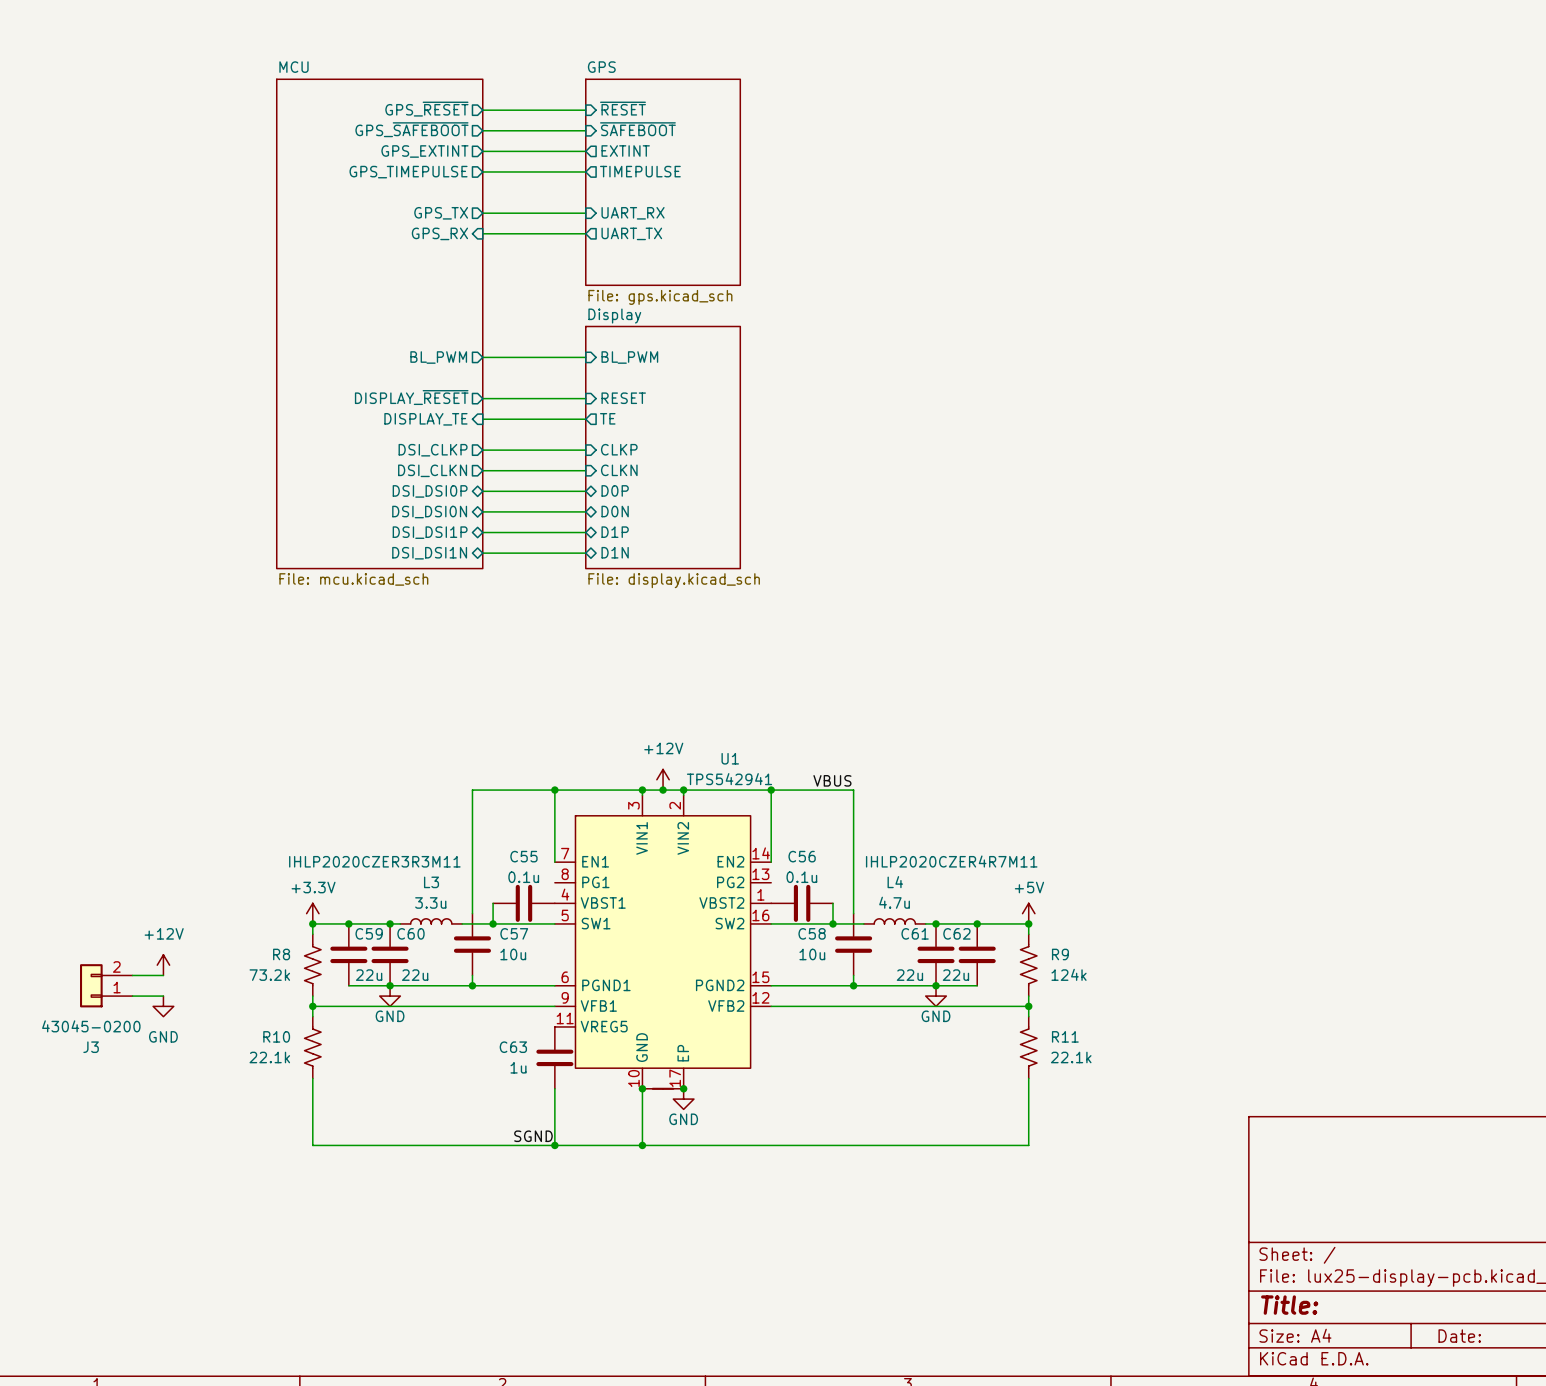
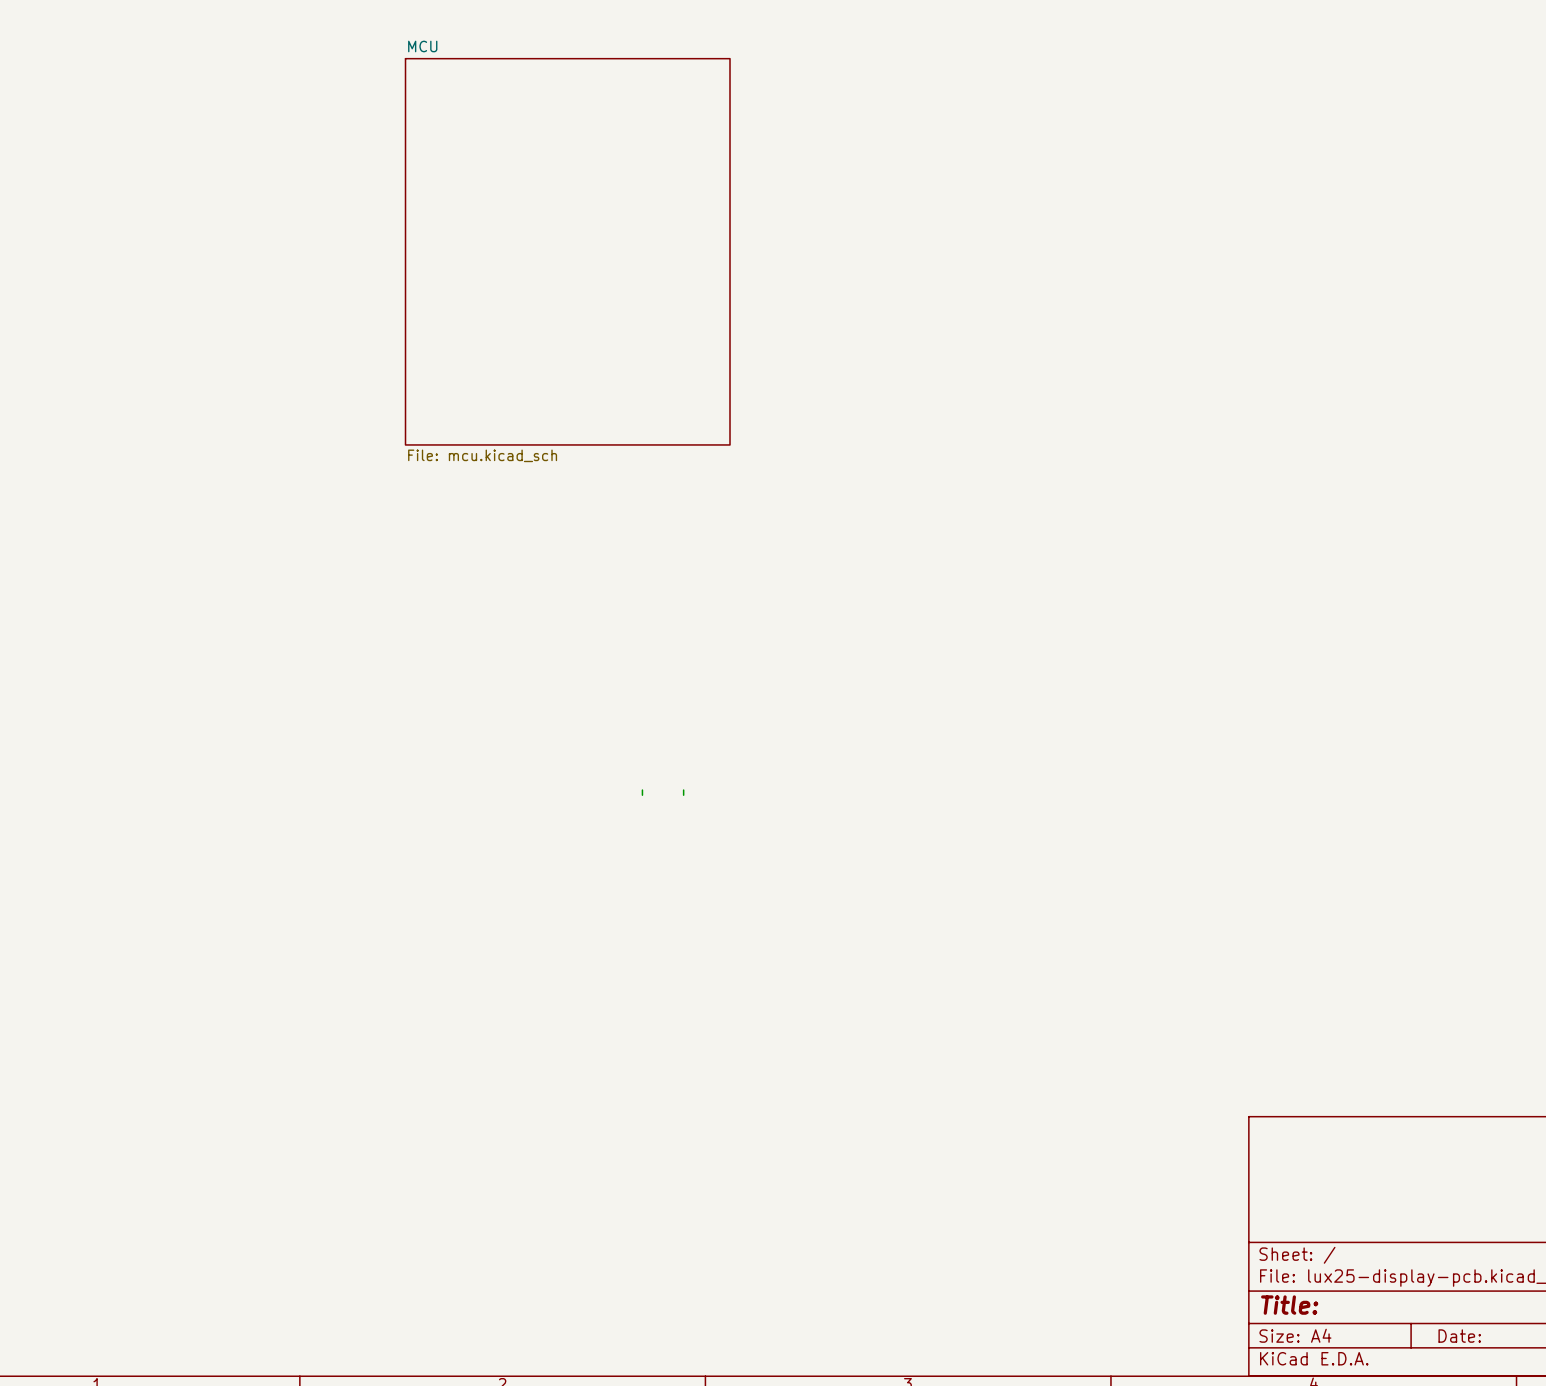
sheet pin: ~{RESET} (623, 108) -> none
sheet pin: GPS_~{RESET} (426, 109) -> none
wire: (482, 110) (585, 110) -> none
sheet pin: GPS_~{SAFEBOOT} (411, 129) -> none
sheet pin: ~{SAFEBOOT} (637, 129) -> none
wire: (482, 130) (585, 130) -> none
sheet pin: GPS_EXTINT (424, 151) -> none
wire: (482, 151) (585, 151) -> none
sheet pin: EXTINT (625, 151) -> none
wire: (482, 171) (585, 171) -> none
sheet pin: TIMEPULSE (640, 171) -> none
sheet pin: GPS_TIMEPULSE (408, 172) -> none
sheet GPS: File: gps.kicad_sch (663, 182) -> none
sheet pin: GPS_TX (441, 213) -> none
wire: (482, 213) (585, 213) -> none
sheet pin: UART_RX (633, 213) -> none
sheet pin: GPS_RX (439, 233) -> none
wire: (482, 233) (585, 233) -> none
sheet pin: UART_TX (631, 233) -> none
sheet MCU: none -> File: mcu.kicad_sch (567, 251)
sheet MCU: File: mcu.kicad_sch (379, 323) -> none
sheet pin: BL_PWM (438, 357) -> none
wire: (482, 357) (585, 357) -> none
sheet pin: BL_PWM (629, 357) -> none
sheet pin: DISPLAY_~{RESET} (411, 397) -> none
wire: (482, 398) (585, 398) -> none
sheet pin: RESET (623, 398) -> none
sheet pin: TE (607, 418) -> none
sheet pin: DISPLAY_TE (425, 419) -> none
wire: (482, 419) (585, 419) -> none
sheet Display: File: display.kicad_sch (663, 447) -> none
sheet pin: CLKP (619, 449) -> none
sheet pin: DSI_CLKP (433, 450) -> none
wire: (482, 450) (585, 450) -> none
sheet pin: DSI_CLKN (432, 470) -> none
wire: (482, 470) (585, 470) -> none
sheet pin: CLKN (619, 470) -> none
sheet pin: D0P (615, 490) -> none
sheet pin: DSI_DSI0P (430, 491) -> none
wire: (482, 491) (585, 491) -> none
wire: (482, 511) (585, 511) -> none
sheet pin: D0N (615, 511) -> none
sheet pin: DSI_DSI0N (429, 512) -> none
sheet pin: DSI_DSI1P (430, 532) -> none
wire: (482, 532) (585, 532) -> none
sheet pin: D1P (615, 532) -> none
sheet pin: D1N (615, 552) -> none
sheet pin: DSI_DSI1N (429, 553) -> none
wire: (482, 553) (585, 553) -> none
power symbol: +12V (663, 779) -> none
label: VBUS (832, 780) -> none
wire: (554, 790) (554, 862) -> none
junction: (554, 790) -> none
junction: (642, 790) -> none
junction: (663, 790) -> none
junction: (683, 790) -> none
wire: (771, 790) (771, 862) -> none
junction: (771, 790) -> none
wire: (493, 903) (493, 923) -> none
C55: 0.1u (523, 903) -> none
C56: 0.1u (802, 903) -> none
wire: (833, 903) (833, 923) -> none
power symbol: +3.3V (312, 913) -> none
wire: (472, 913) (472, 790) (853, 790) (853, 913) -> none
power symbol: +5V (1028, 913) -> none
L3: 3.3u (431, 921) -> none
L4: 4.7u (894, 921) -> none
junction: (312, 923) -> none
junction: (348, 923) -> none
junction: (390, 923) -> none
wire: (400, 923) (312, 923) (312, 934) -> none
wire: (462, 923) (554, 923) -> none
junction: (493, 923) -> none
wire: (771, 923) (863, 923) -> none
junction: (833, 923) -> none
wire: (925, 923) (1028, 923) (1028, 934) -> none
junction: (936, 923) -> none
junction: (977, 923) -> none
junction: (1028, 923) -> none
U1: TPS542941 (663, 941) -> none
C57: 10u (472, 944) -> none
C58: 10u (853, 944) -> none
C59: 22u (348, 954) -> none
C60: 22u (390, 954) -> none
C61: 22u (936, 954) -> none
C62: 22u (977, 954) -> none
power symbol: +12V (163, 965) -> none
R8: 73.2k (312, 965) -> none
R9: 124k (1028, 965) -> none
wire: (132, 975) (163, 975) -> none
wire: (472, 975) (472, 985) -> none
wire: (853, 975) (853, 985) -> none
J3: 43045-0200 (106, 985) -> none
wire: (348, 985) (554, 985) -> none
junction: (390, 985) -> none
junction: (472, 985) -> none
wire: (771, 985) (977, 985) -> none
junction: (853, 985) -> none
junction: (936, 985) -> none
wire: (132, 996) (163, 996) -> none
wire: (312, 996) (312, 1016) -> none
power symbol: GND (390, 996) -> none
power symbol: GND (936, 996) -> none
wire: (1028, 996) (1028, 1016) -> none
power symbol: GND (163, 1006) -> none
wire: (312, 1006) (554, 1006) -> none
junction: (312, 1006) -> none
wire: (771, 1006) (1028, 1006) -> none
junction: (1028, 1006) -> none
R10: 22.1k (312, 1047) -> none
R11: 22.1k (1028, 1047) -> none
C63: 1u (554, 1057) -> none
wire: (312, 1078) (312, 1145) (1028, 1145) (1028, 1078) -> none
wire: (554, 1088) (554, 1145) -> none
wire: (642, 1088) (642, 1145) -> none
junction: (642, 1088) -> none
part: (663, 1088) -> none
junction: (683, 1088) -> none
power symbol: GND (683, 1099) -> none
label: SGND (533, 1136) -> none
junction: (554, 1145) -> none
junction: (642, 1145) -> none

